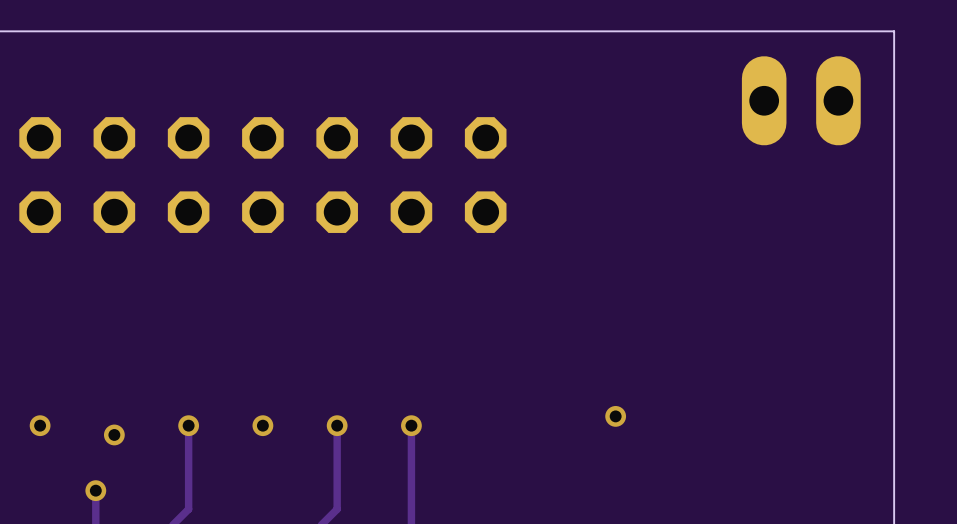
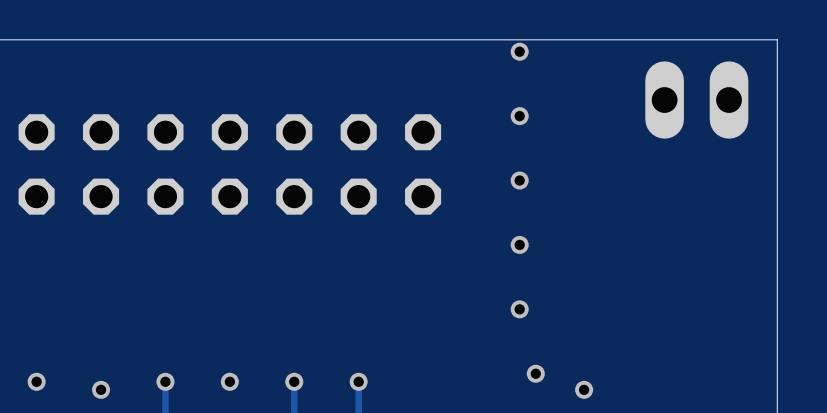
via: none -> (519, 51)
via: none -> (519, 116)
via: none -> (519, 180)
via: none -> (519, 244)
via: none -> (519, 309)
via: none -> (584, 389)

